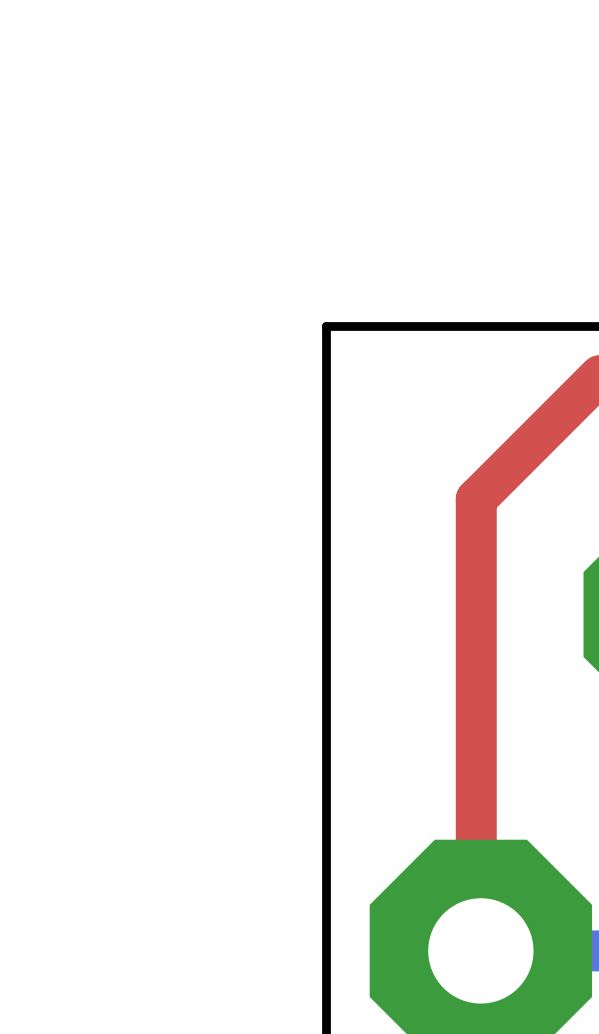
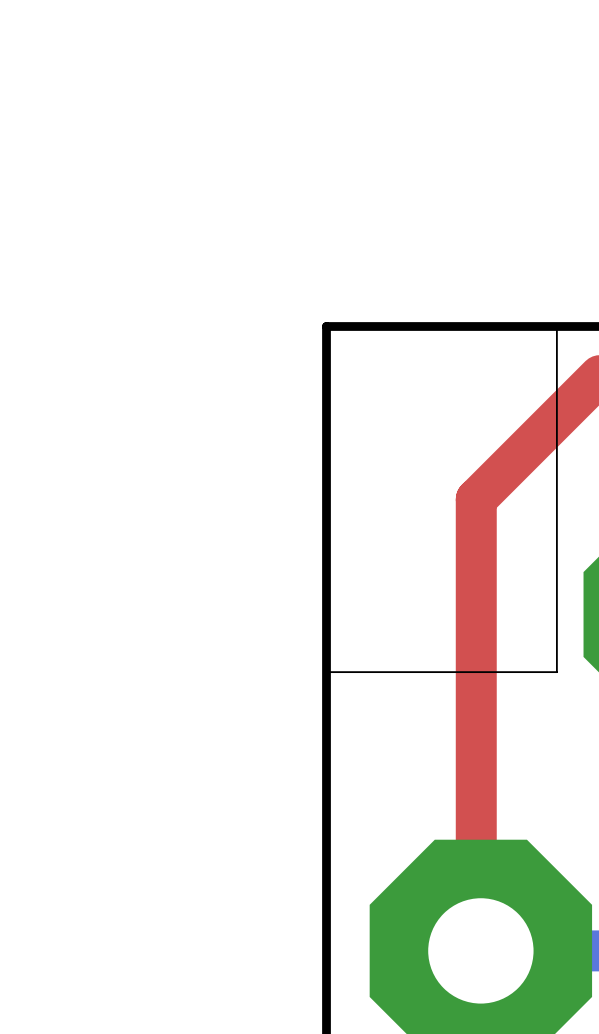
board edge: none -> (556, 326) (326, 326) (326, 672) (556, 672) (556, 326)

